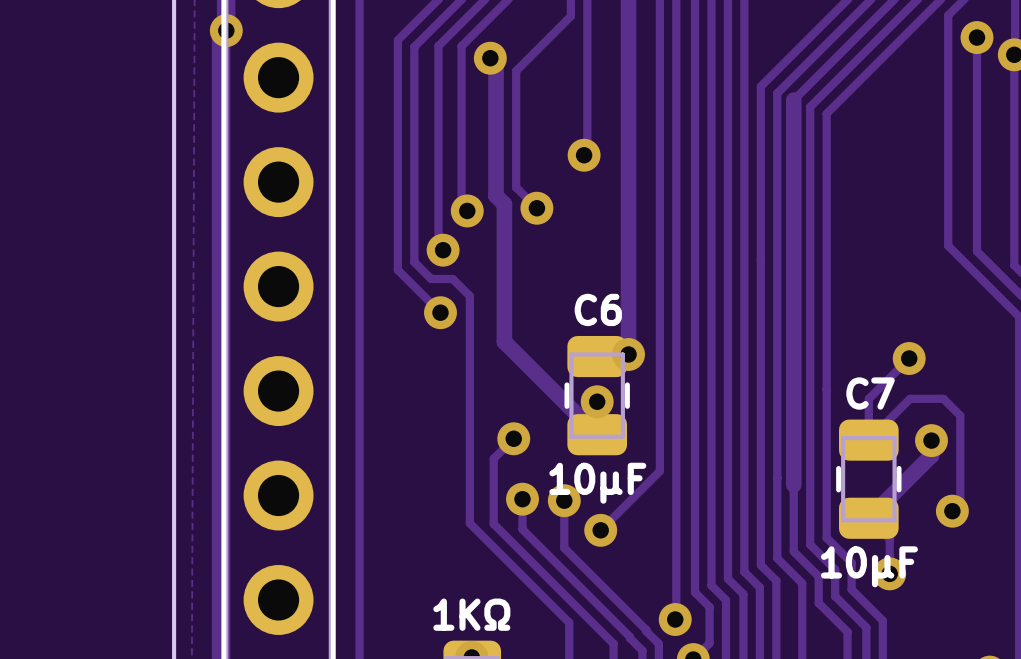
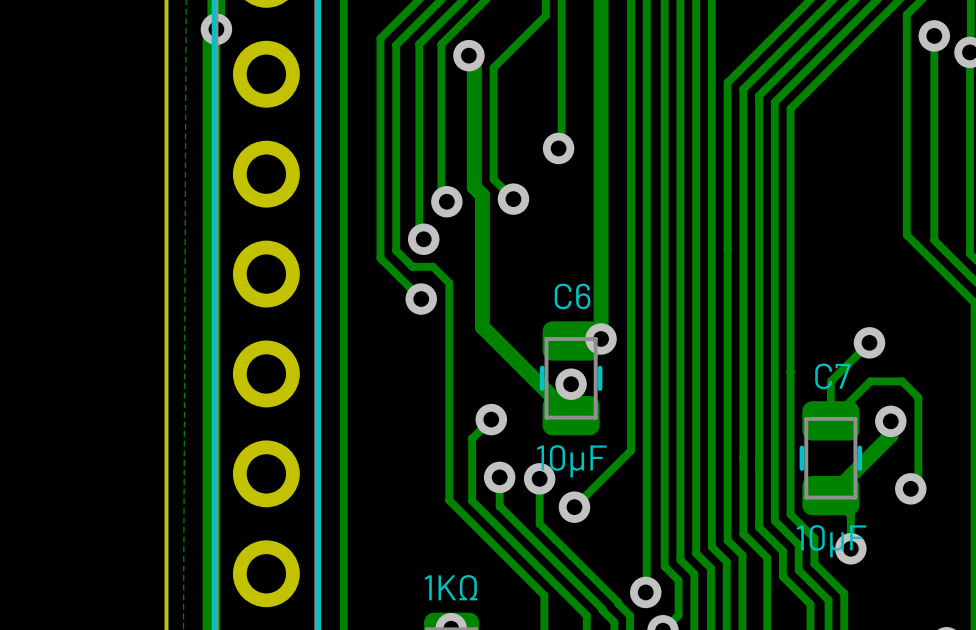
track width: thick (793, 100) (793, 484) -> thin (759, 95) (759, 463)

